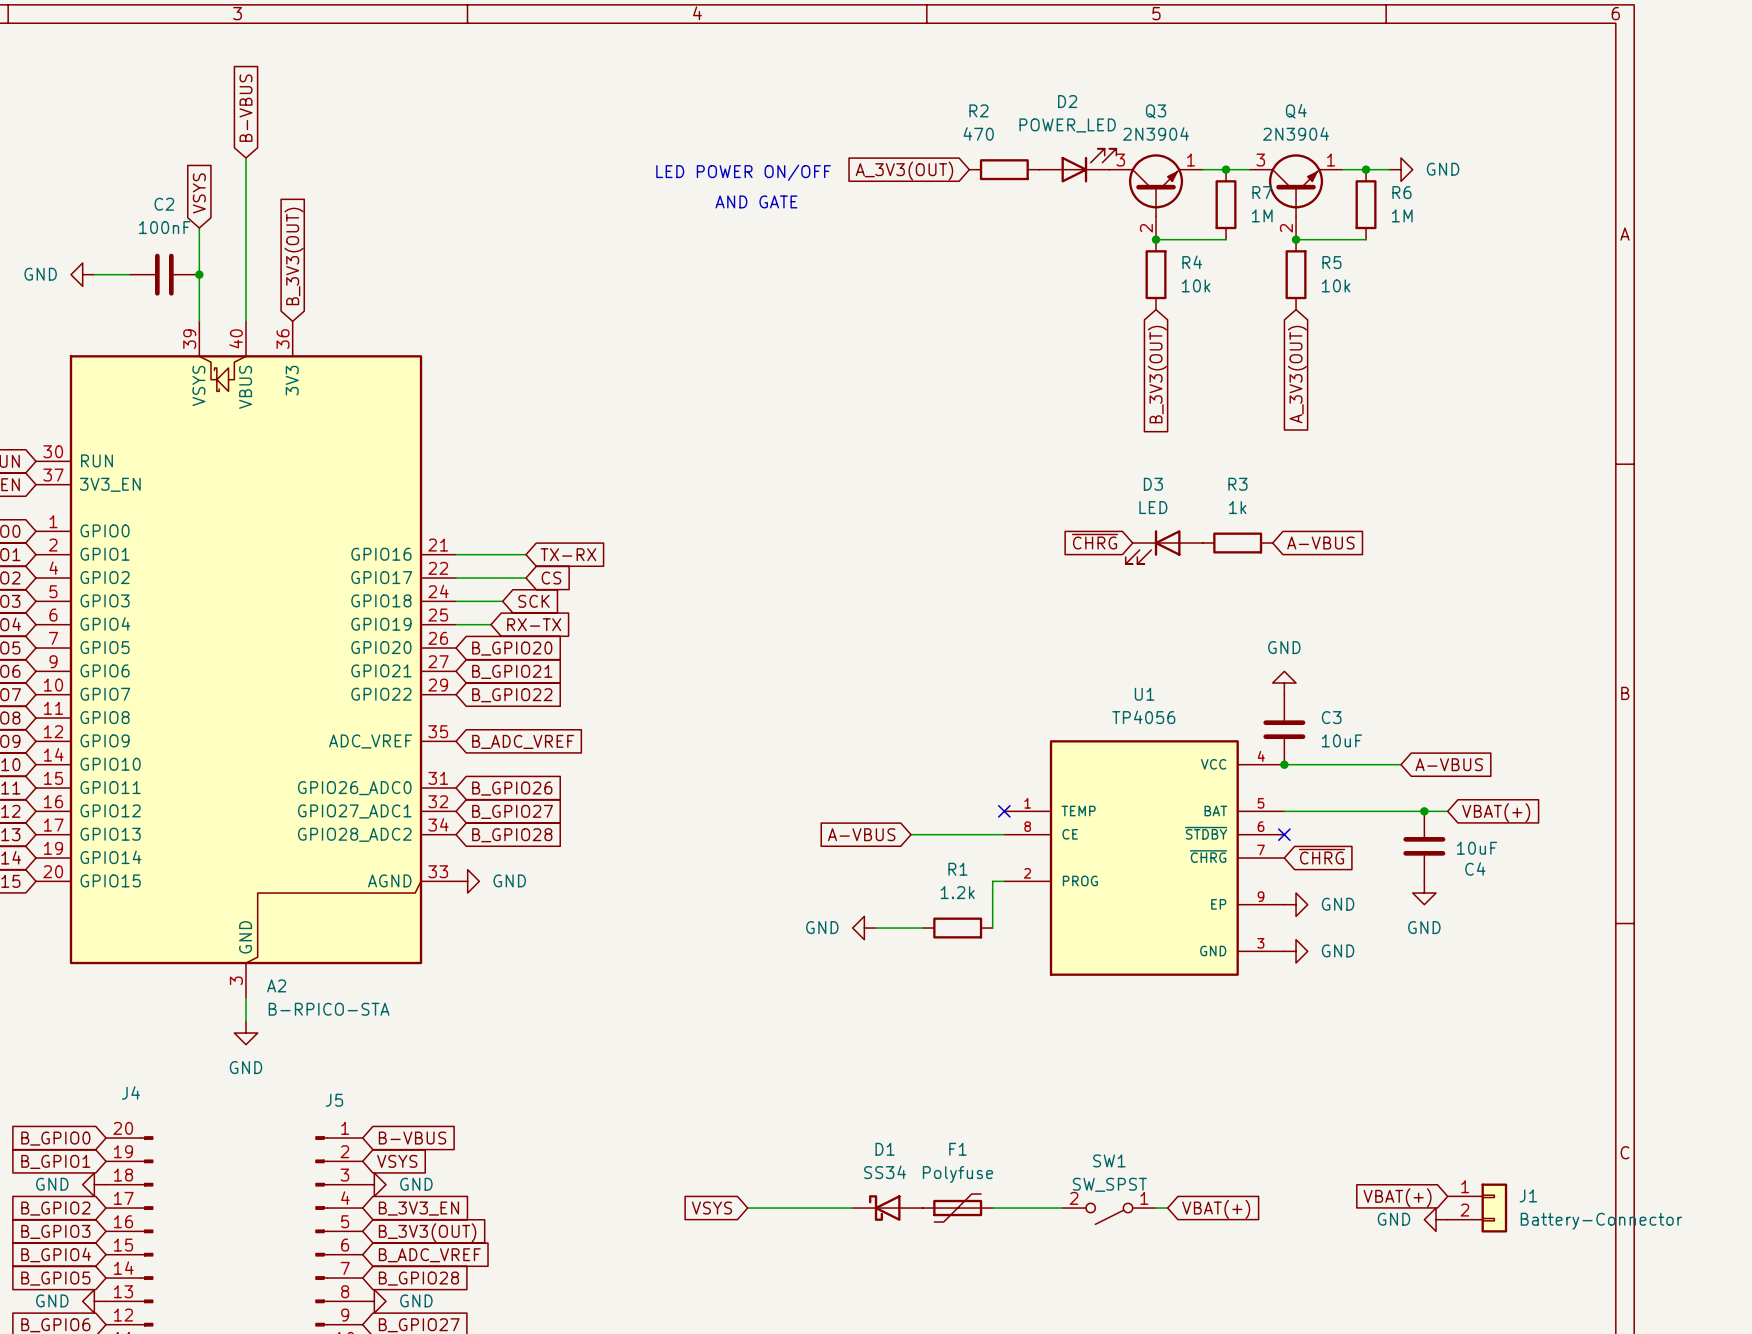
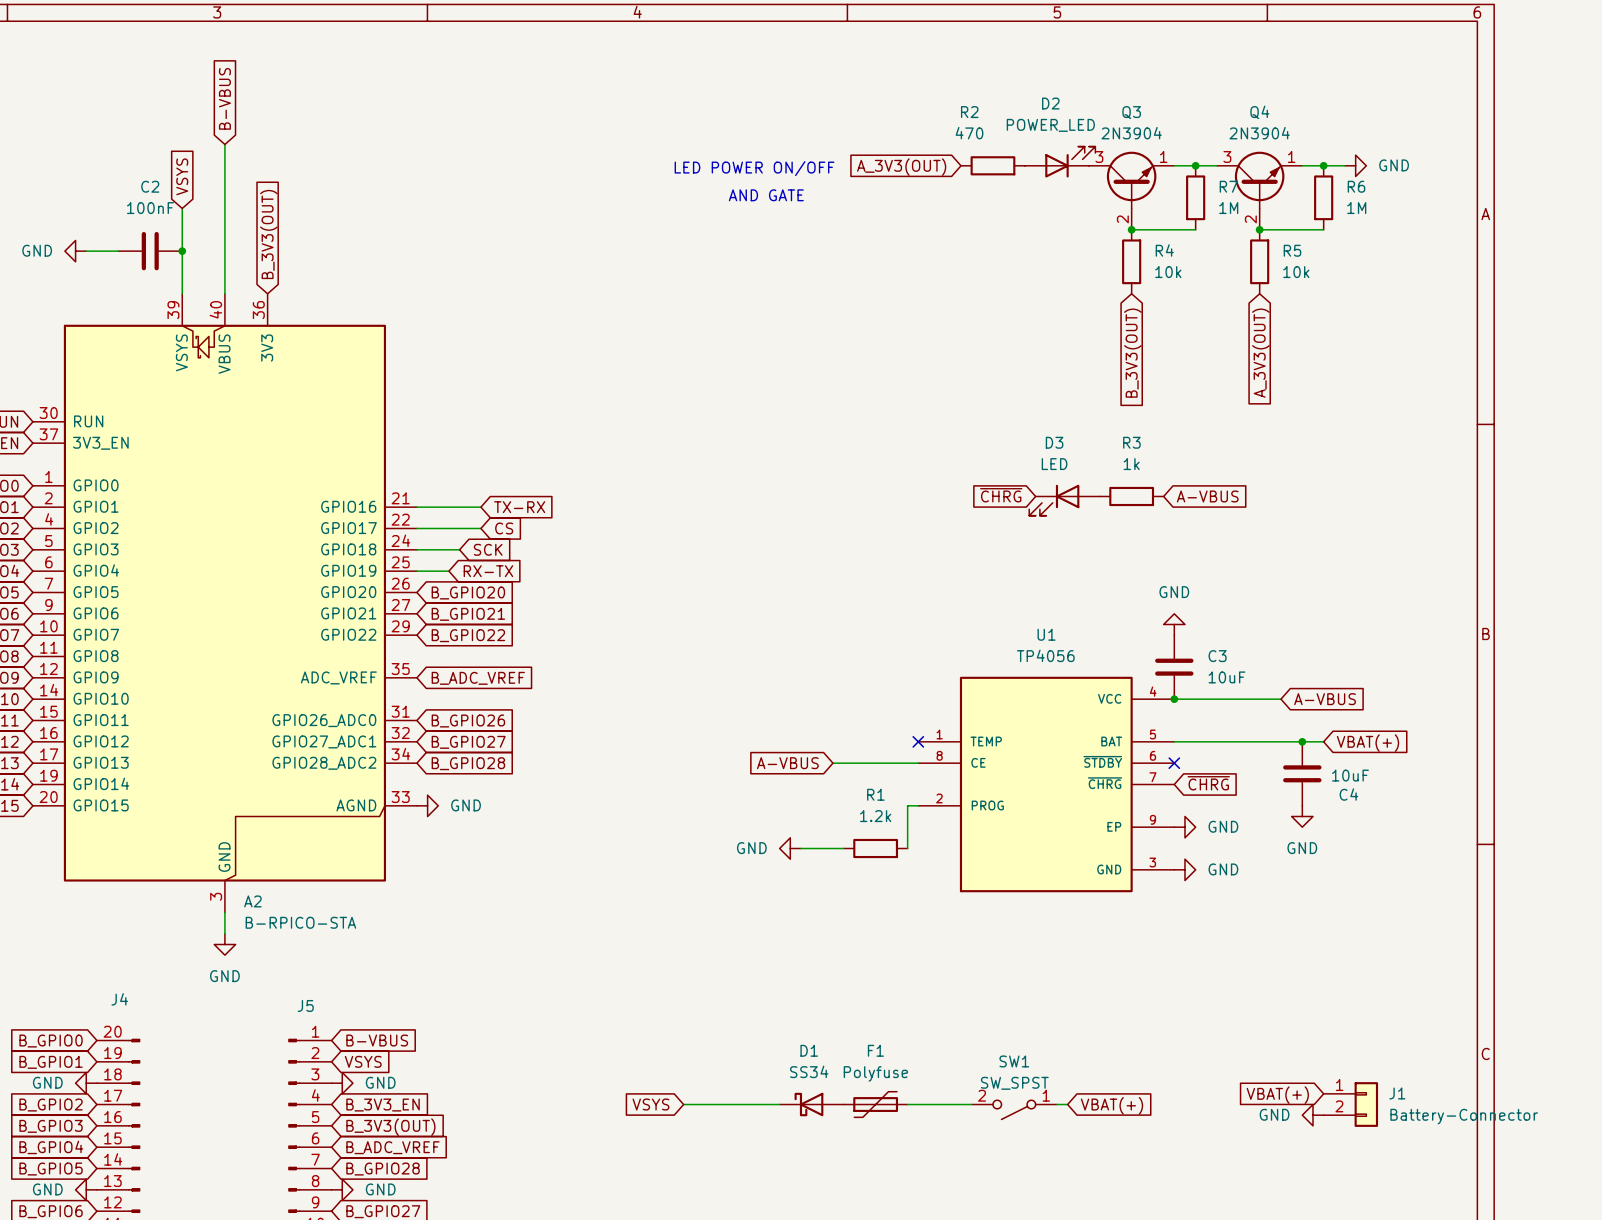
D2 position: (1077, 165) -> (1060, 162)
R2 position: (1004, 169) -> (992, 165)
wire: (1202, 169) (1249, 169) -> (1174, 165) (1216, 165)
junction: (1226, 169) -> none
wire: (1342, 169) (1389, 169) -> (1302, 165) (1344, 165)
junction: (1366, 169) -> none
power symbol position: GND (1401, 169) -> GND (1355, 165)
global label position: A_3V3(OUT) (904, 171) -> A_3V3(OUT) (901, 167)
text position: LED POWER ON/OFF (743, 172) -> LED POWER ON/OFF (754, 168)
junction: none -> (1195, 165)
junction: none -> (1323, 165)
Q3 position: (1156, 196) -> (1131, 190)
Q4 position: (1296, 196) -> (1259, 190)
text position: AND GATE (756, 201) -> AND GATE (766, 195)
R7 position: (1226, 204) -> (1195, 197)
R6 position: (1366, 204) -> (1323, 197)
wire: (1156, 239) (1226, 239) -> (1131, 229) (1195, 229)
junction: (1156, 239) -> none
wire: (1296, 239) (1366, 239) -> (1259, 229) (1323, 229)
junction: (1296, 239) -> none
junction: none -> (1131, 229)
junction: none -> (1259, 229)
R4 position: (1156, 274) -> (1131, 261)
R5 position: (1296, 274) -> (1259, 261)
global label position: B_3V3(OUT) (1157, 374) -> B_3V3(OUT) (1132, 353)
global label position: A_3V3(OUT) (1297, 374) -> A_3V3(OUT) (1260, 353)

